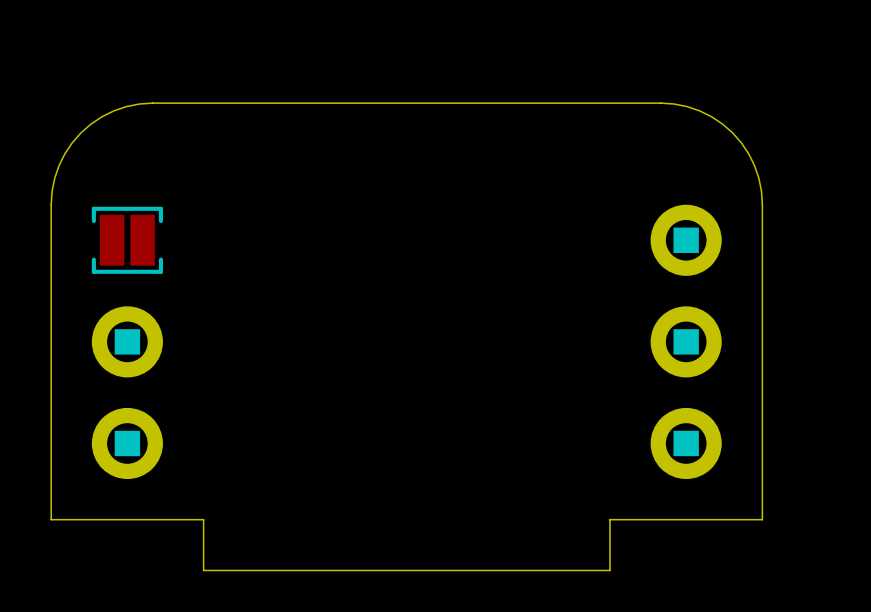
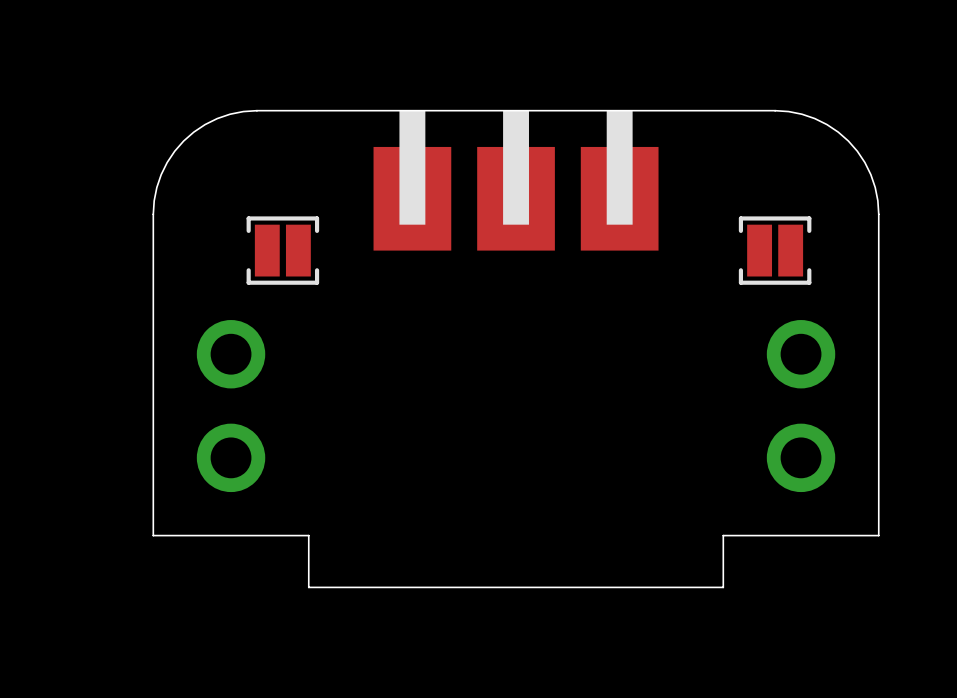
part: none -> (516, 180)
part position: (127, 240) -> (282, 250)
part: none -> (775, 250)
part footprint: [91, 306, 163, 480] -> [196, 320, 266, 493]
part: (686, 341) -> none
part: none -> (801, 406)

